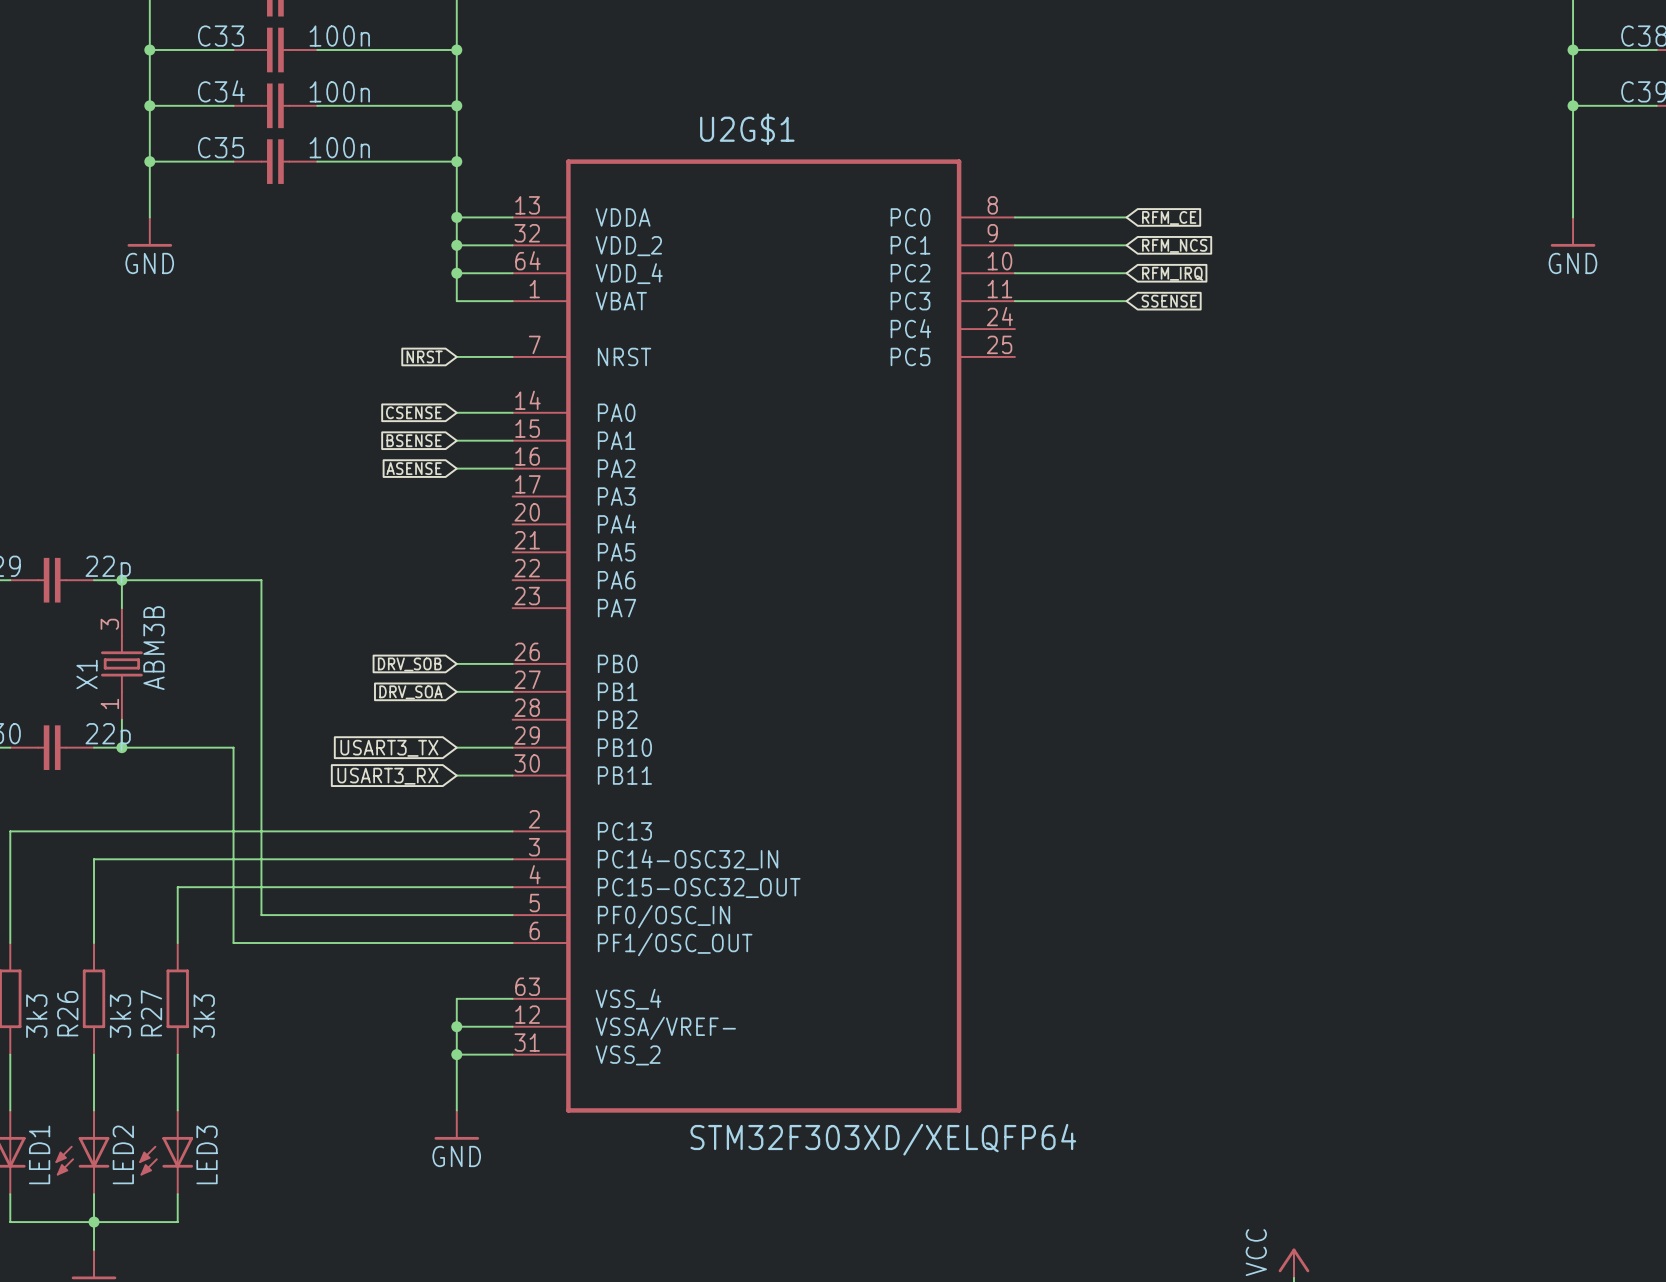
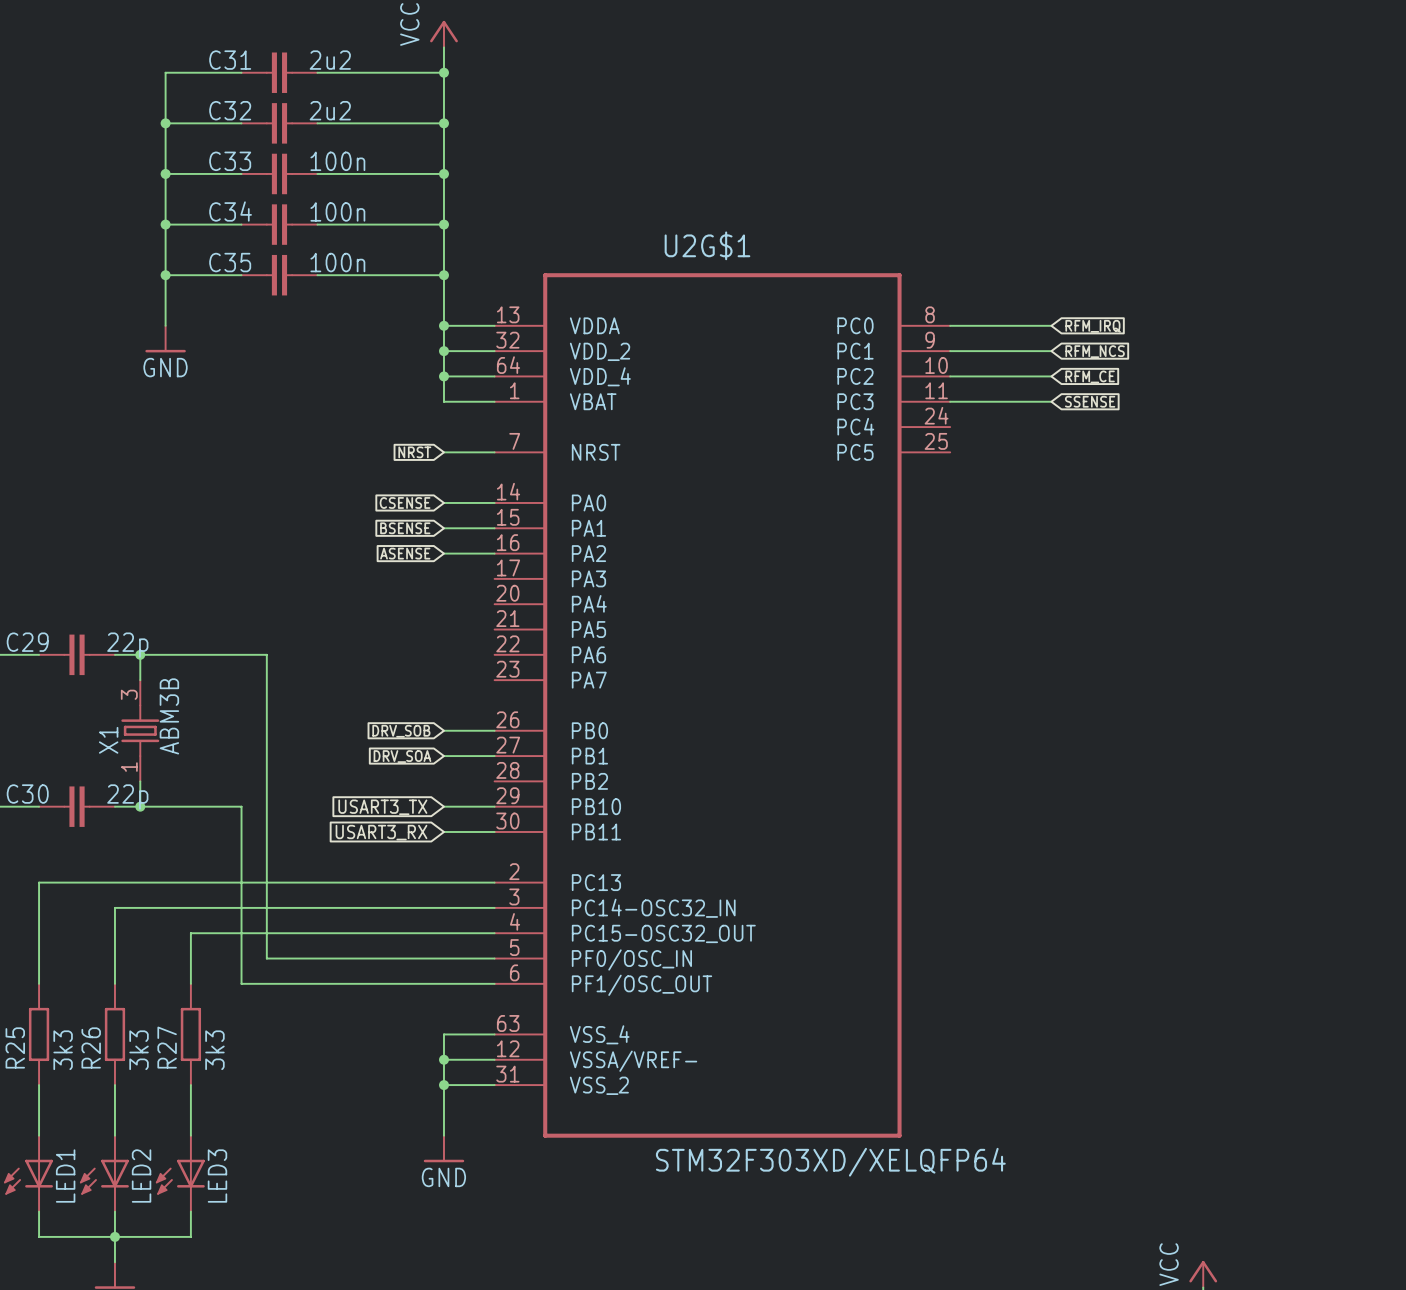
global label: RFM_CE (1169, 217) -> RFM_IRQ (1093, 326)
global label: RFM_IRQ (1172, 273) -> RFM_CE (1090, 376)

